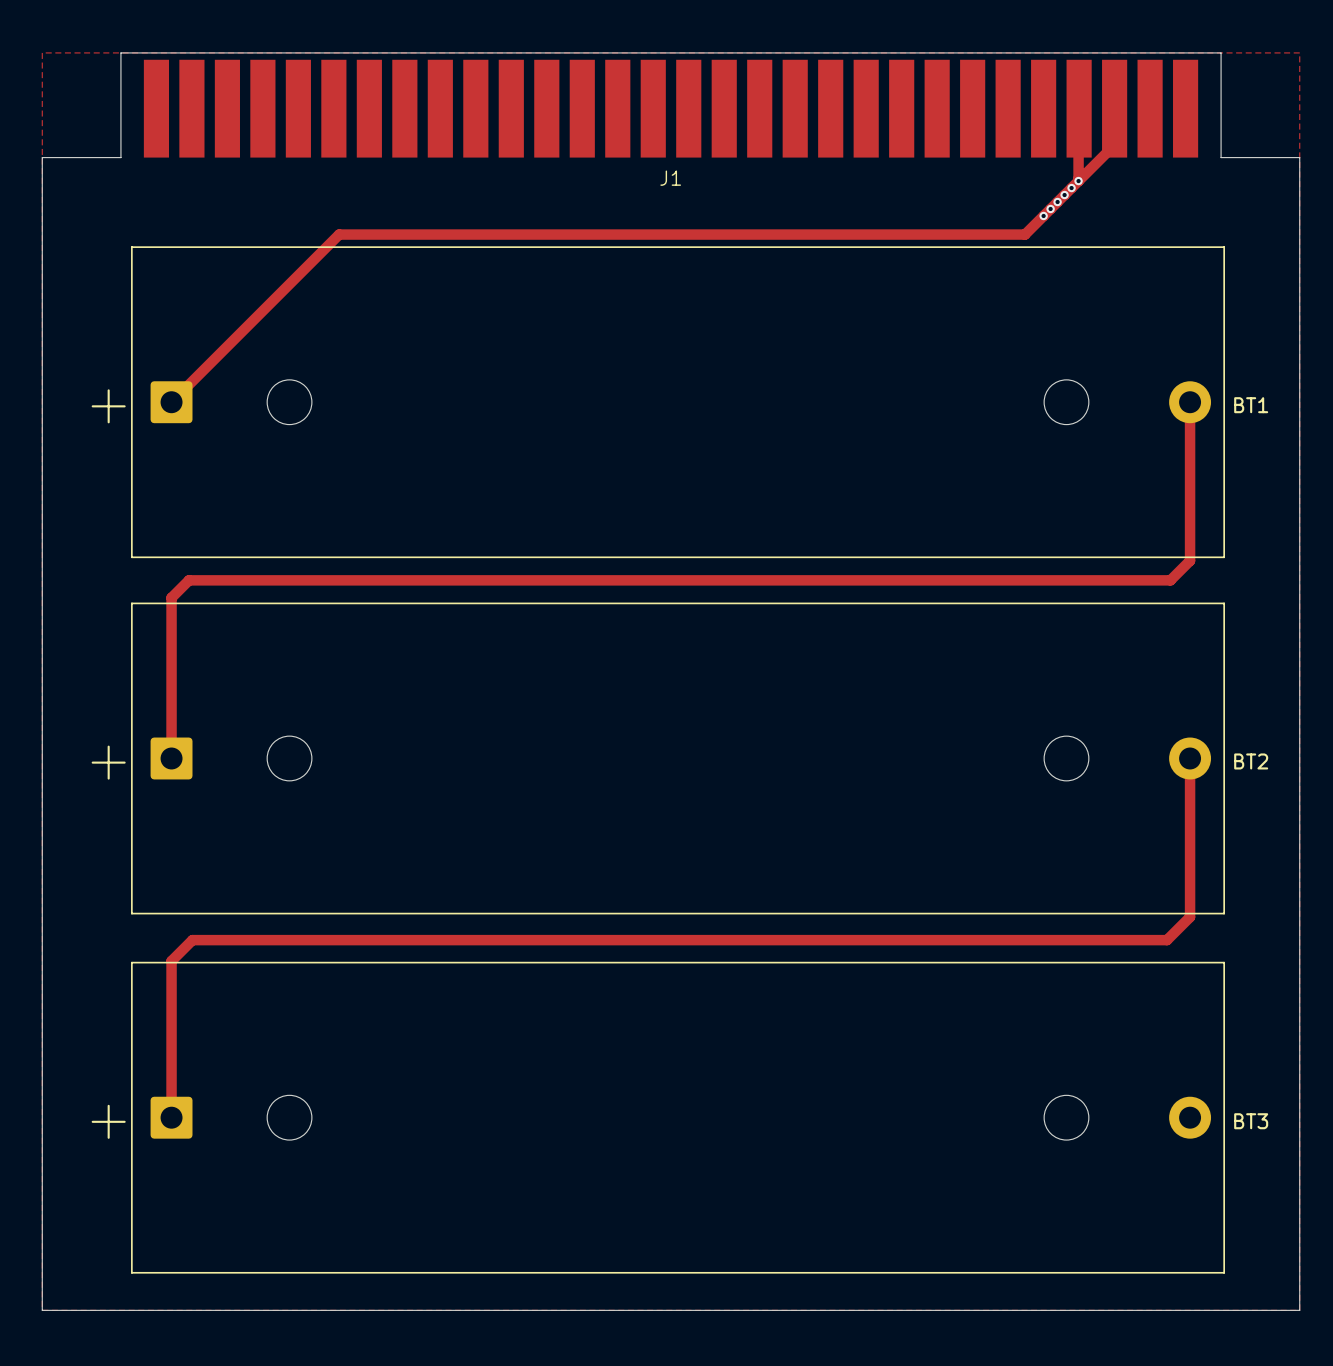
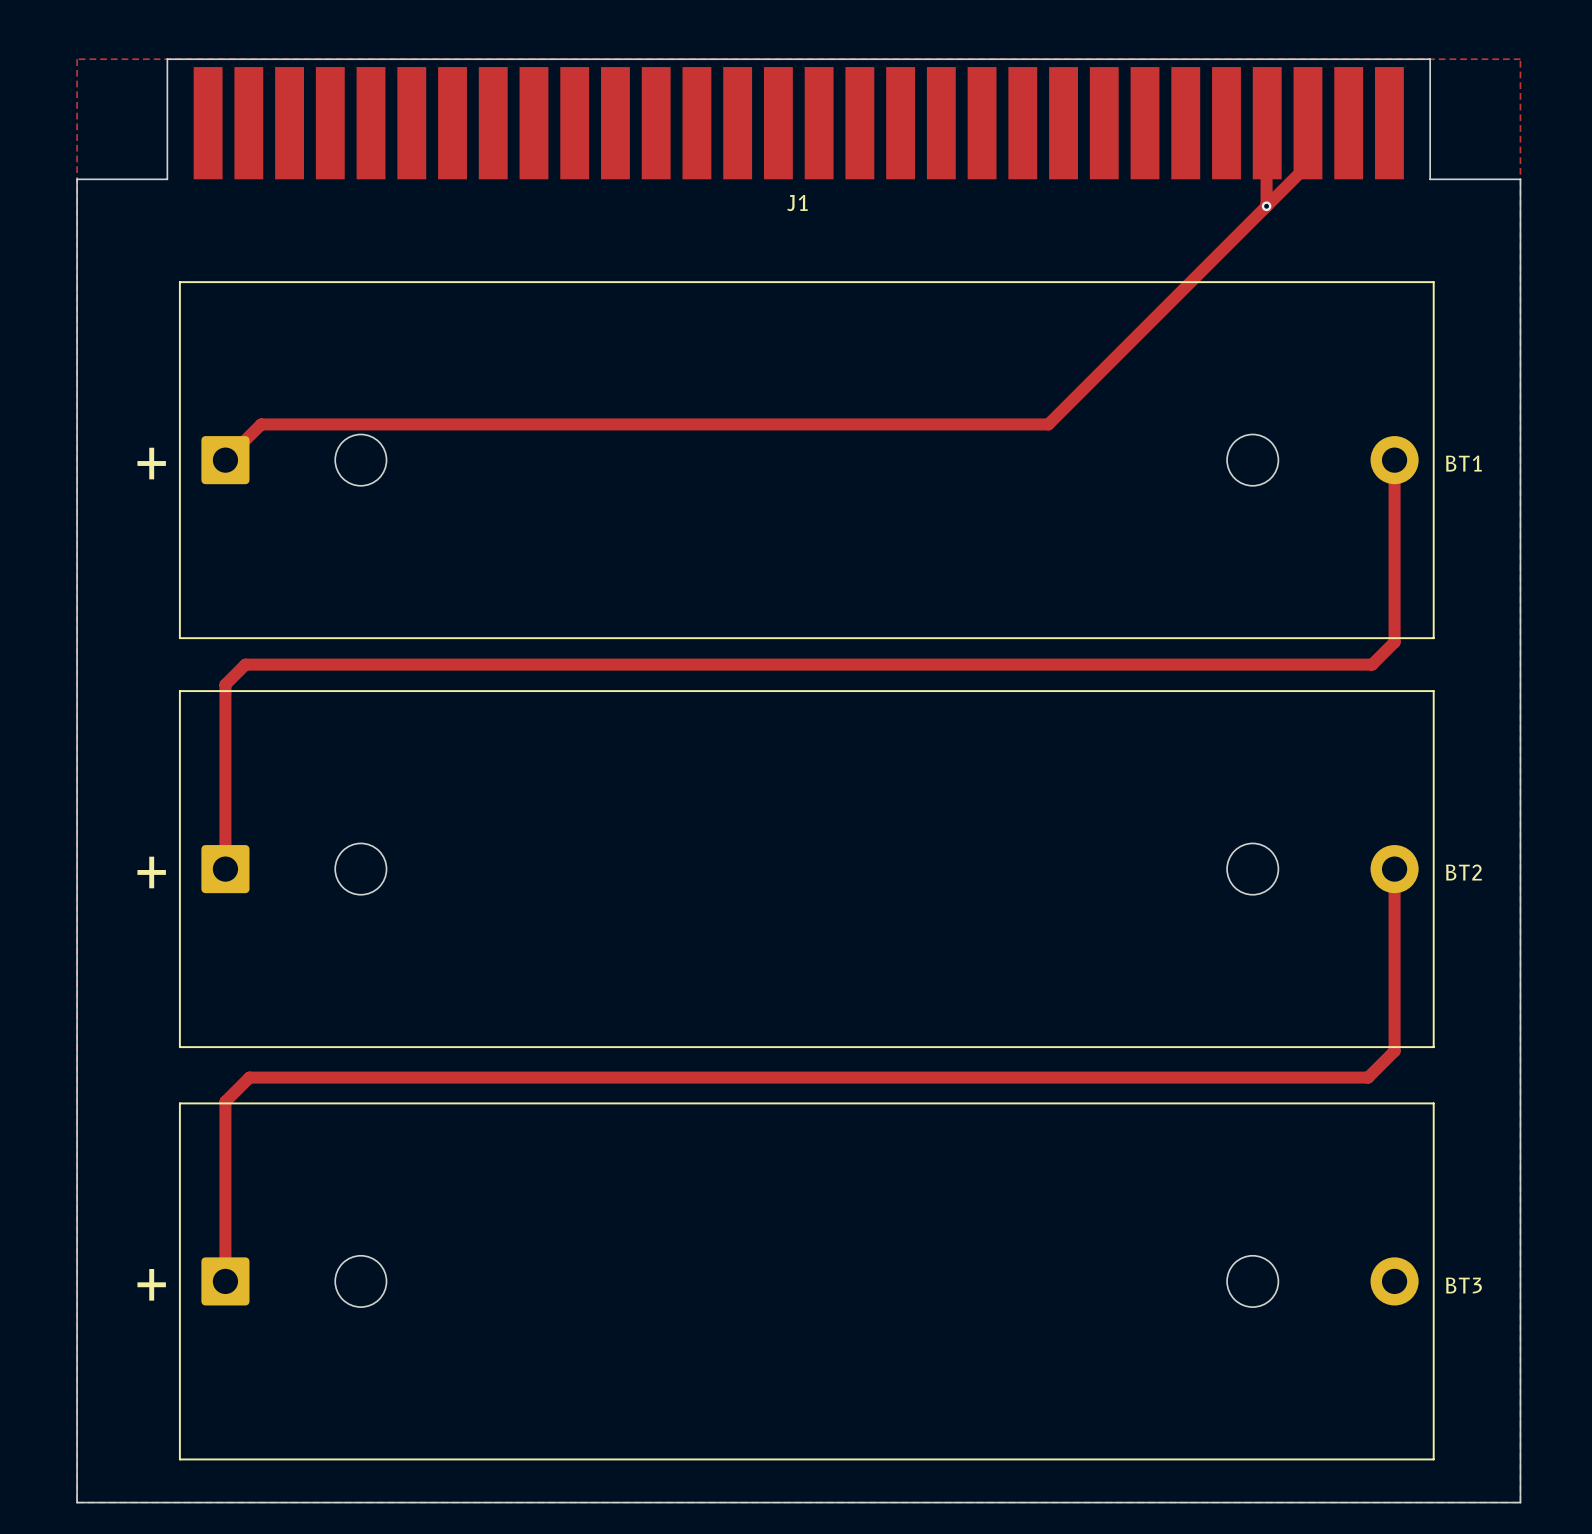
via: (1071, 188) -> none
via: (1064, 195) -> none
via: (1057, 202) -> none
via: (1050, 208) -> none
via: (1043, 215) -> none
track: (1025, 234) (339, 234) (202, 371) -> (1205, 267) (1048, 424) (261, 424)

